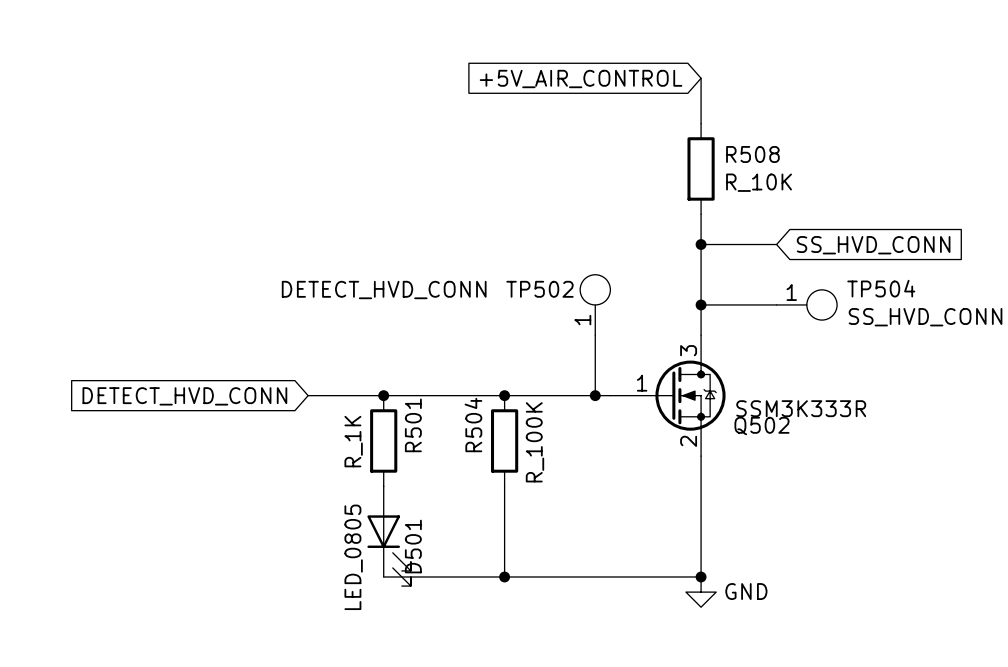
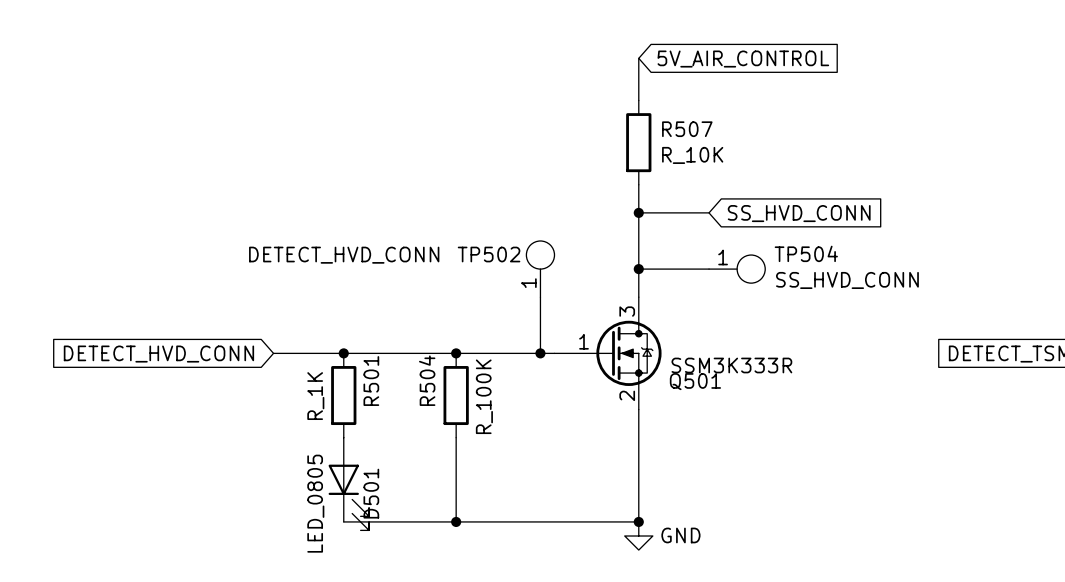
global label: +5V_AIR_CONTROL (581, 79) -> 5V_AIR_CONTROL (743, 59)
R508 name: R508 (752, 154) -> R507 (687, 129)
Q502 name: Q502 (761, 426) -> Q501 (695, 381)

